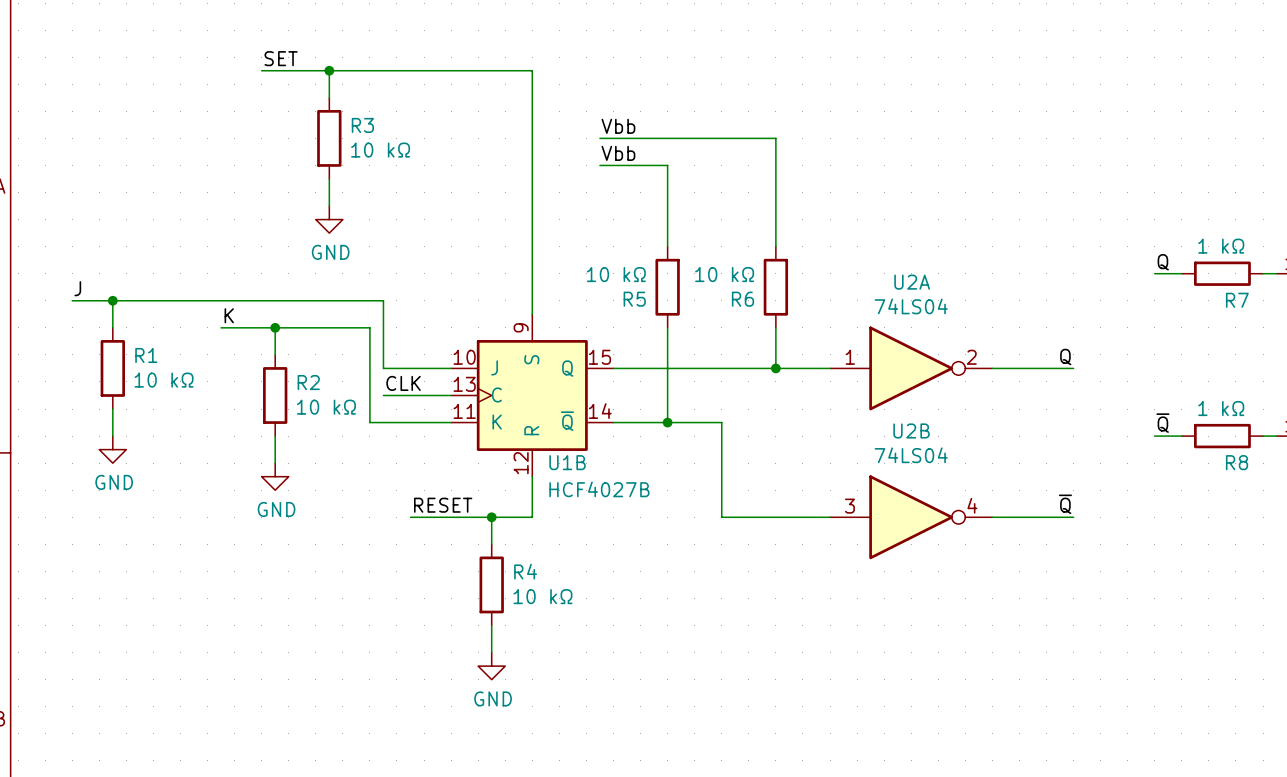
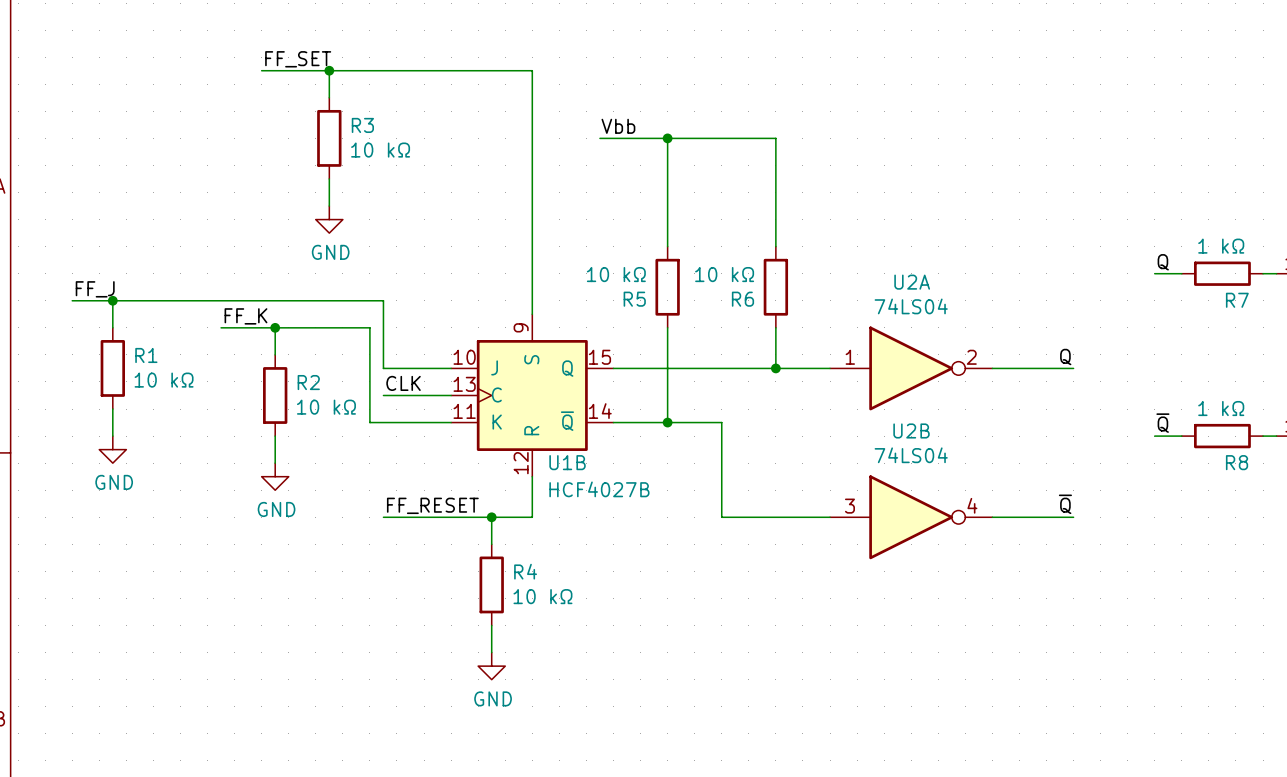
label: SET (281, 58) -> FF_SET (298, 59)
junction: none -> (667, 138)
label: Vbb (618, 153) -> none
wire: (599, 165) (667, 165) -> (667, 138) (667, 165)
label: J (77, 288) -> FF_J (95, 289)
label: K (229, 315) -> FF_K (245, 316)
label: RESET (443, 505) -> FF_RESET (432, 505)
wire: none -> (383, 517) (410, 517)

